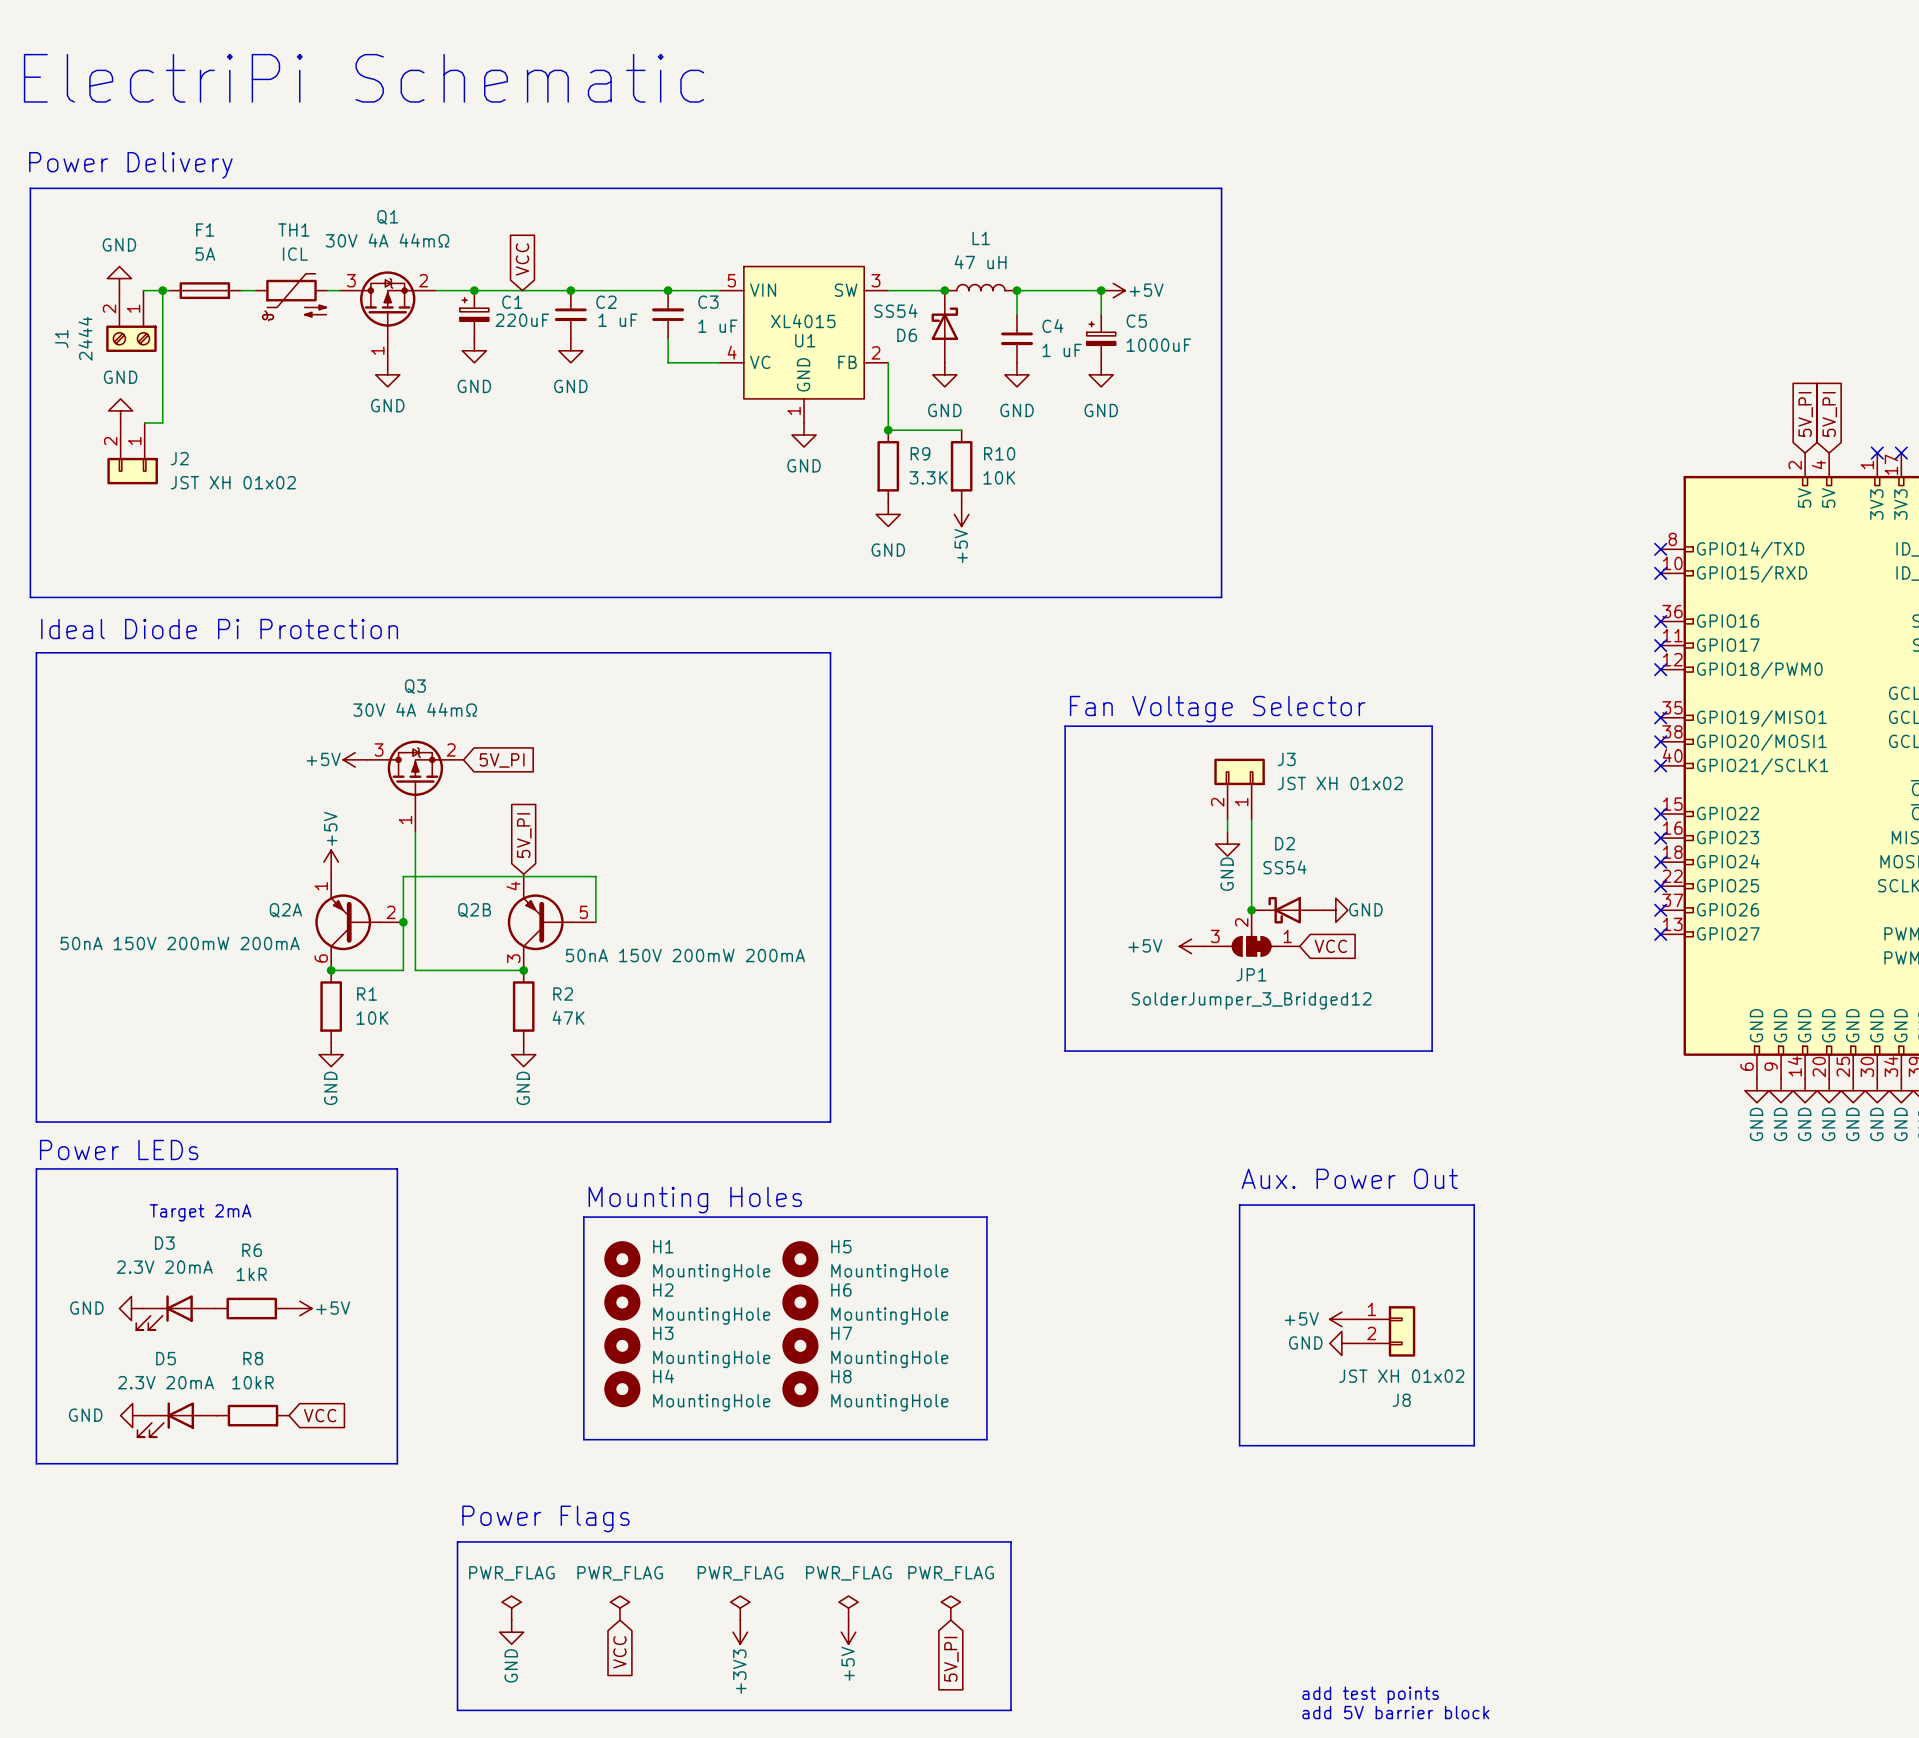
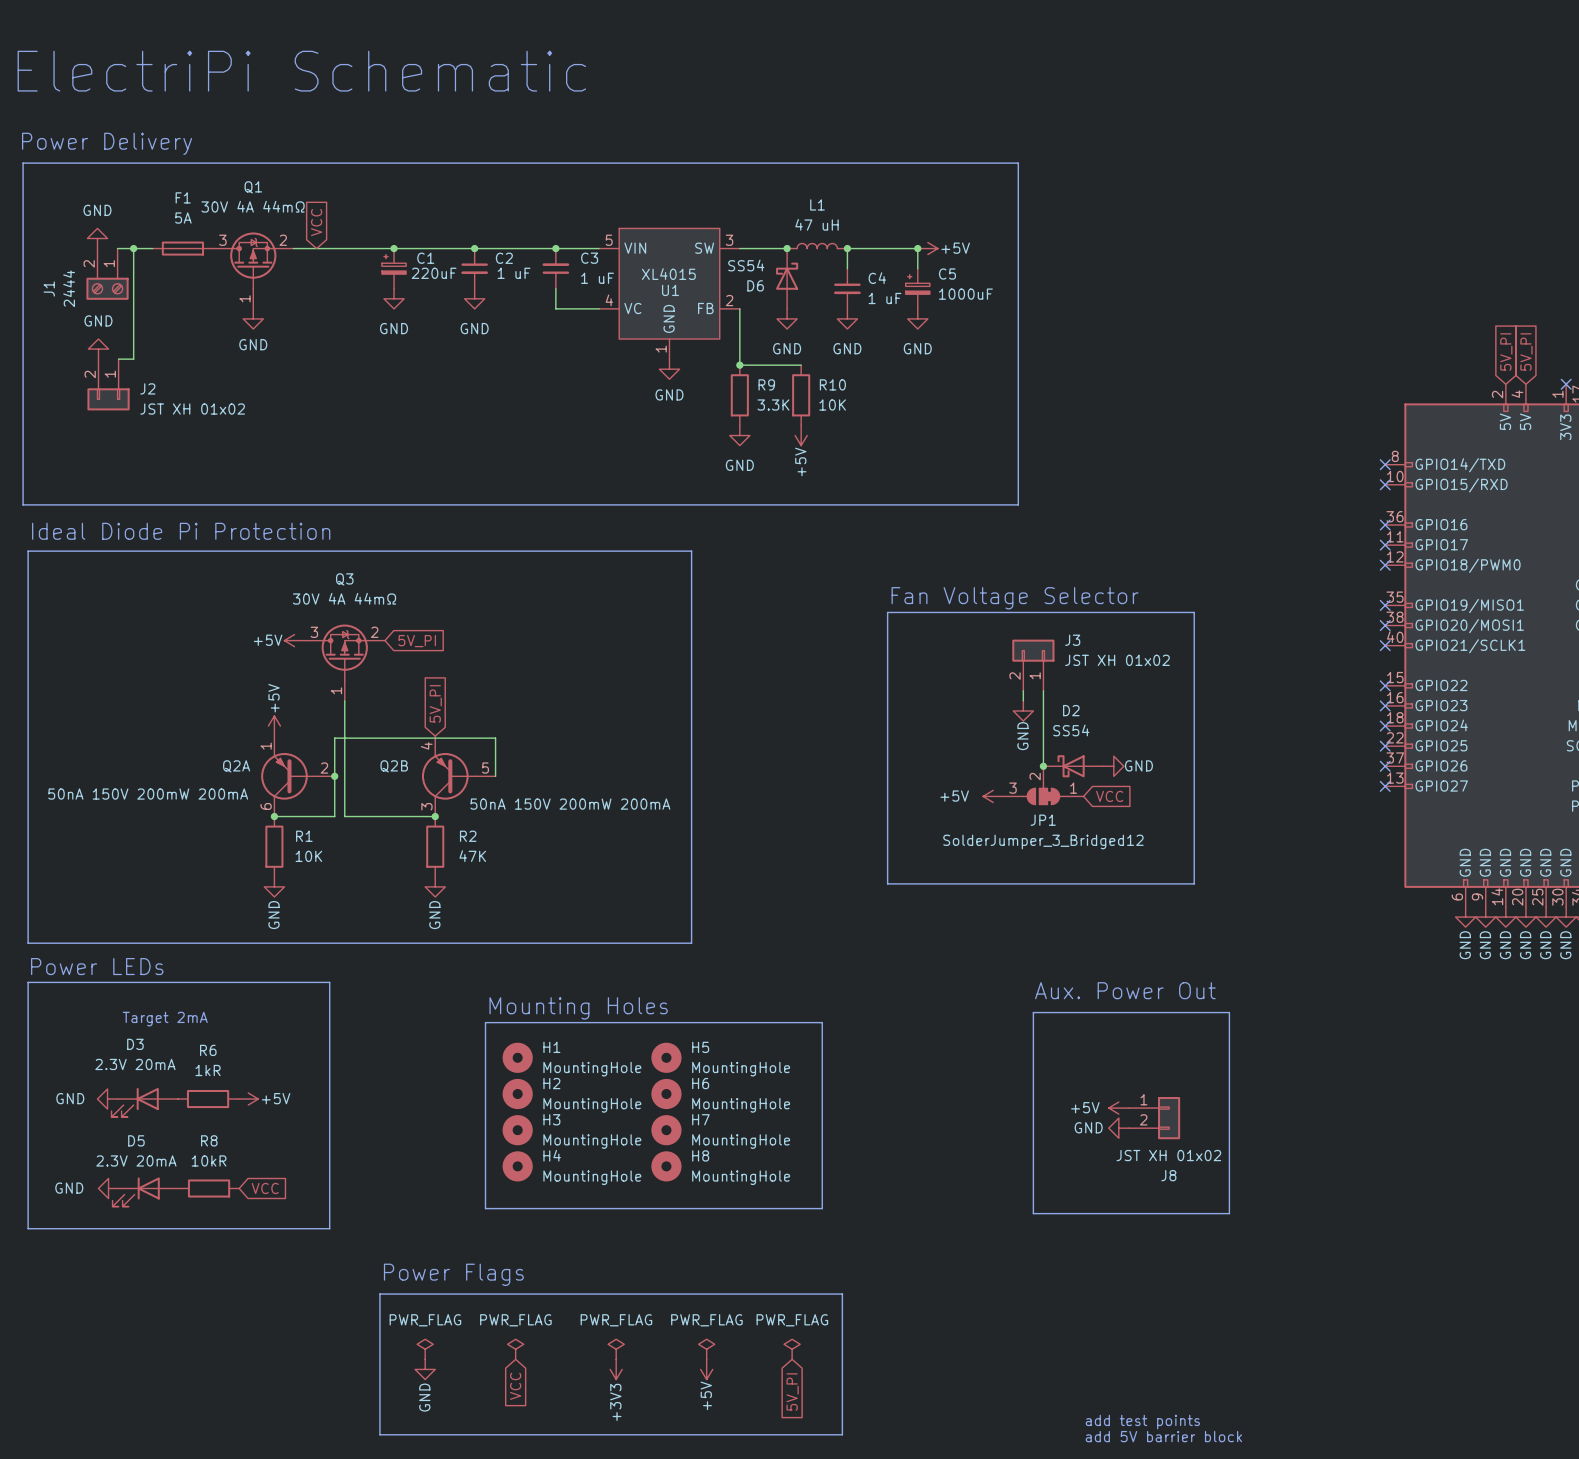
global label position: VCC (522, 259) -> VCC (316, 222)
F1 position: (204, 290) -> (182, 248)
TH1: ICL (291, 297) -> none
Q1 position: (387, 317) -> (253, 270)
power symbol position: GND (387, 374) -> GND (253, 318)

